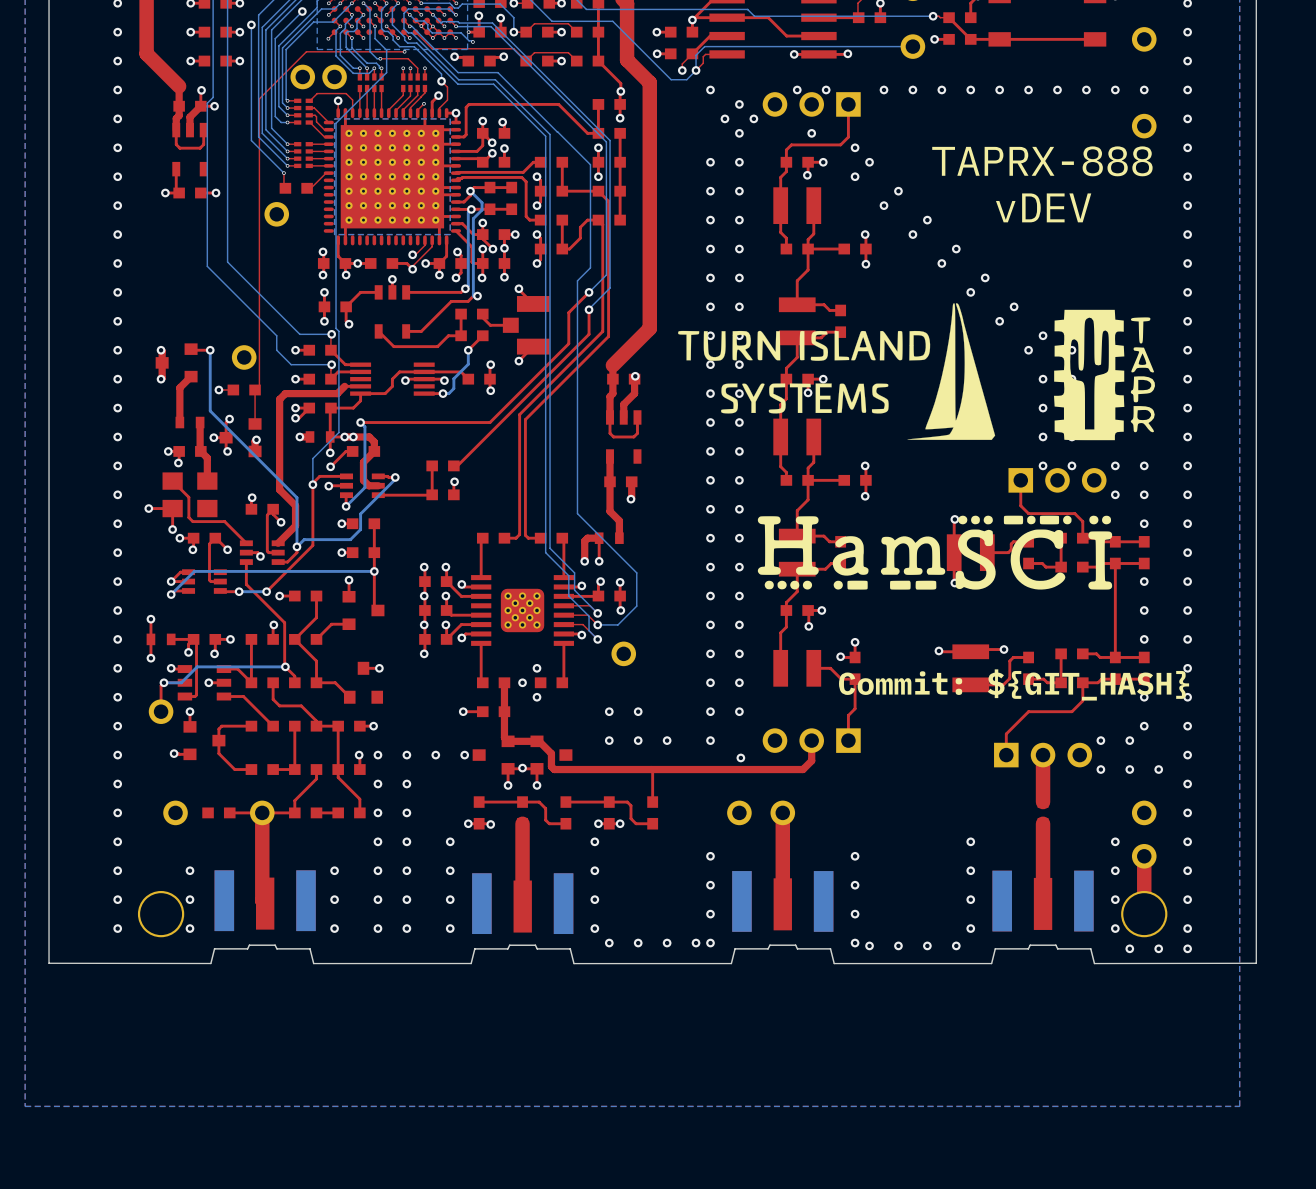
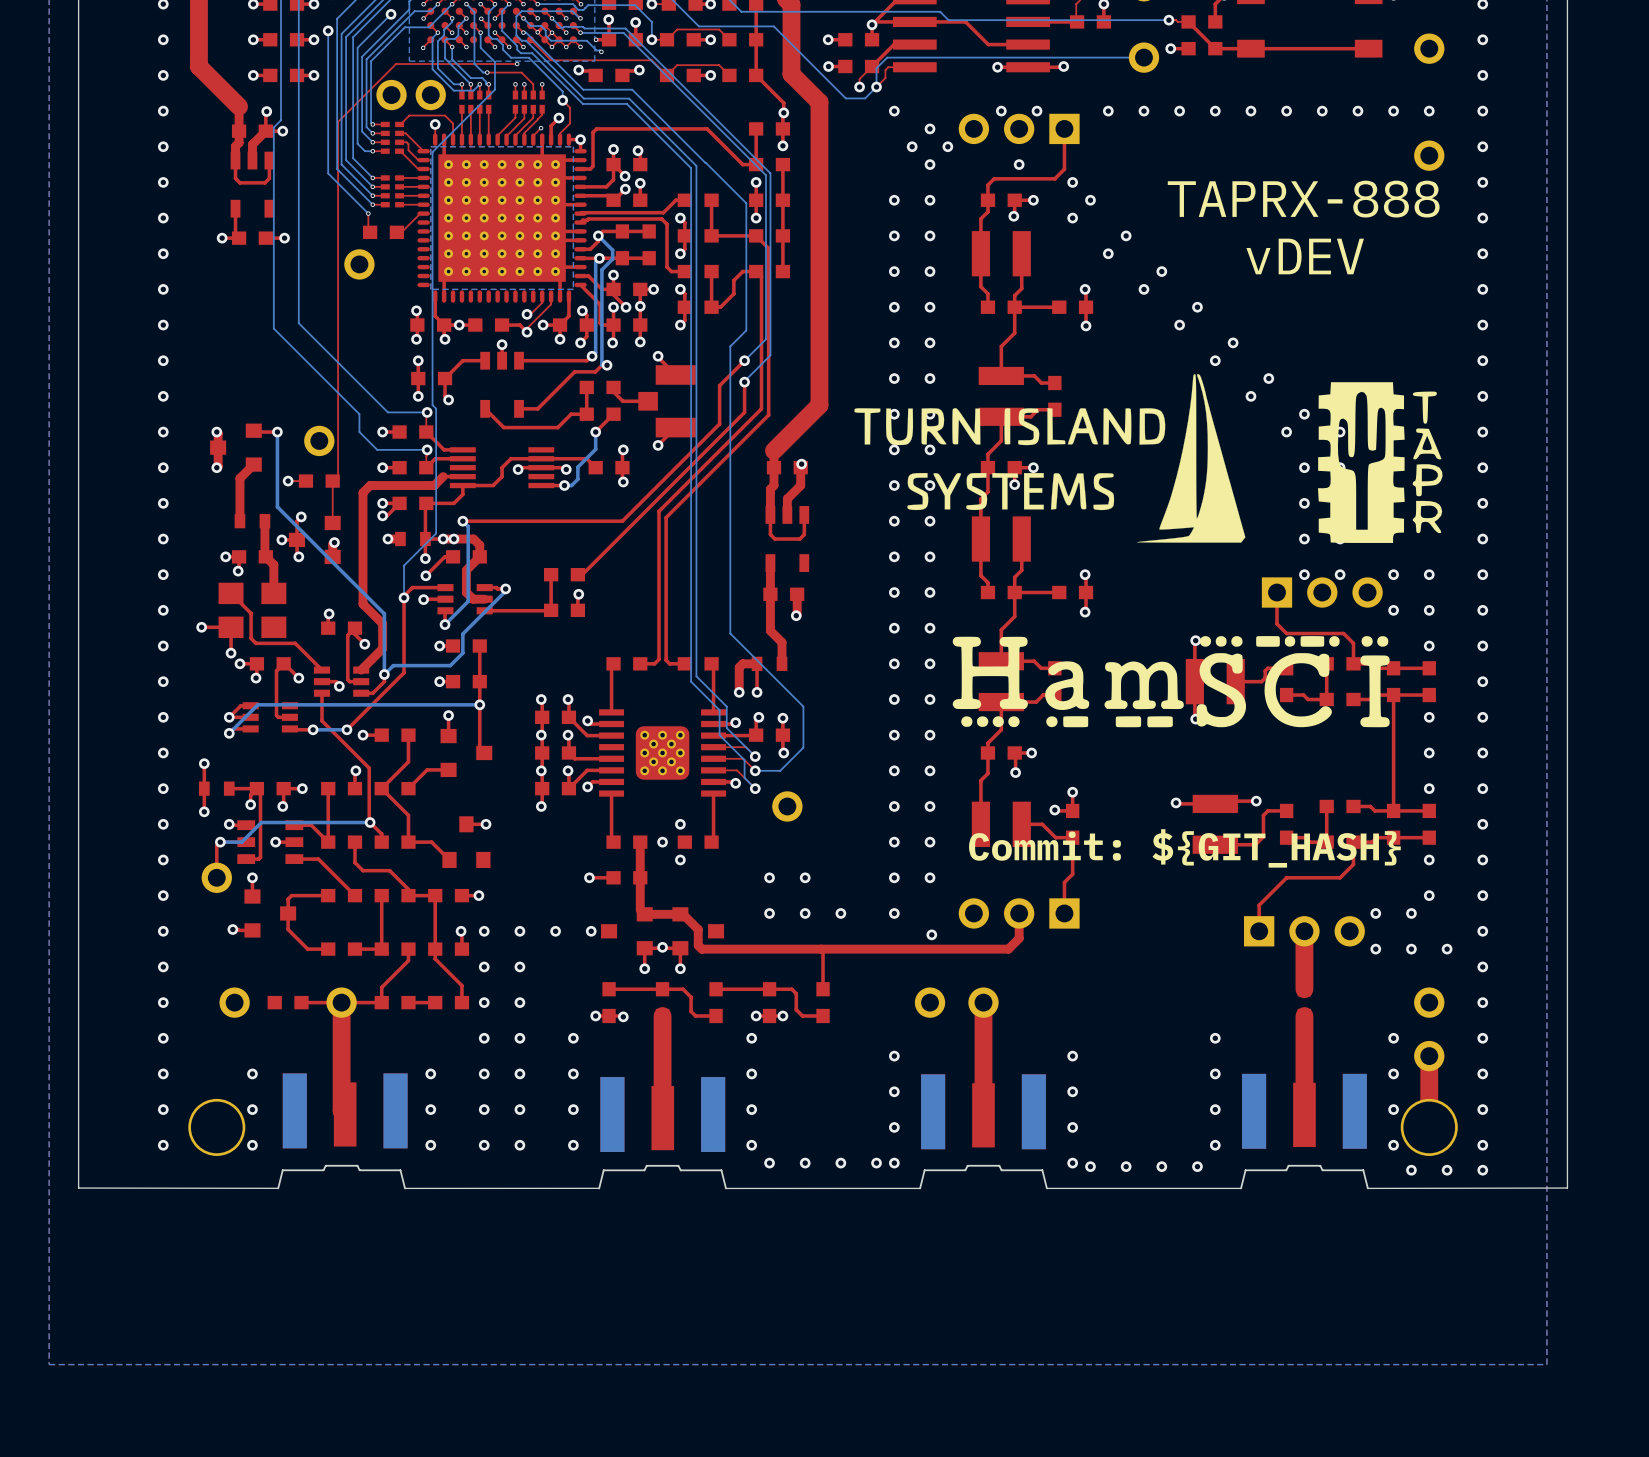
text position: Commit: ${GIT_HASH} (1014, 684) -> Commit: ${GIT_HASH} (1184, 848)

